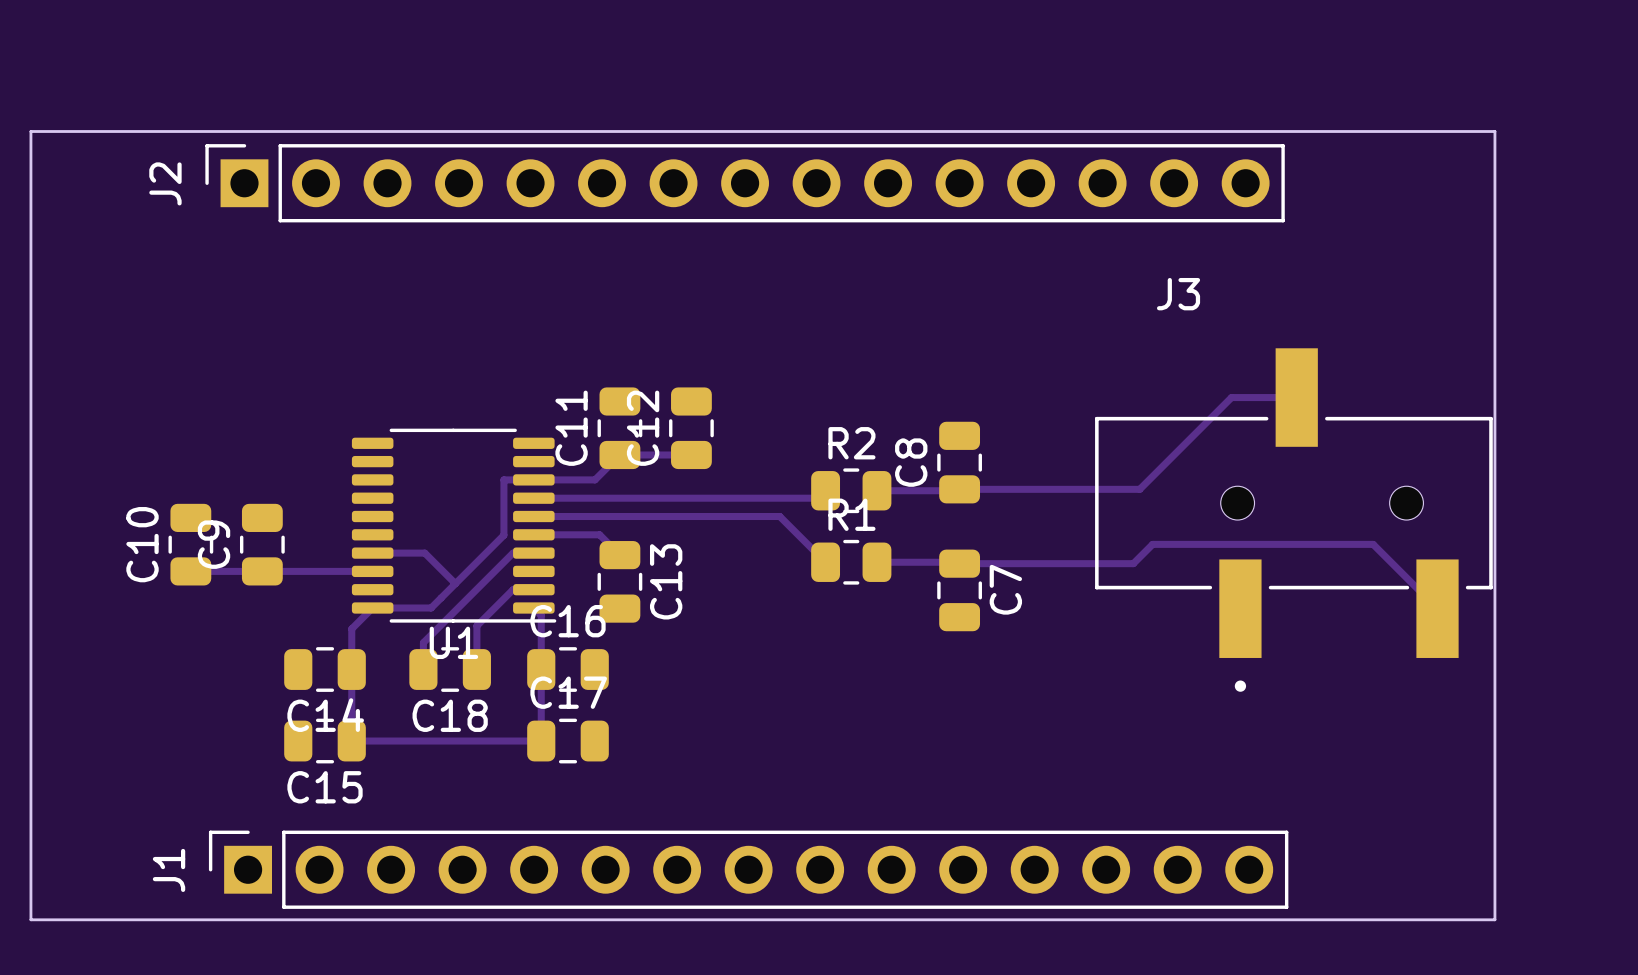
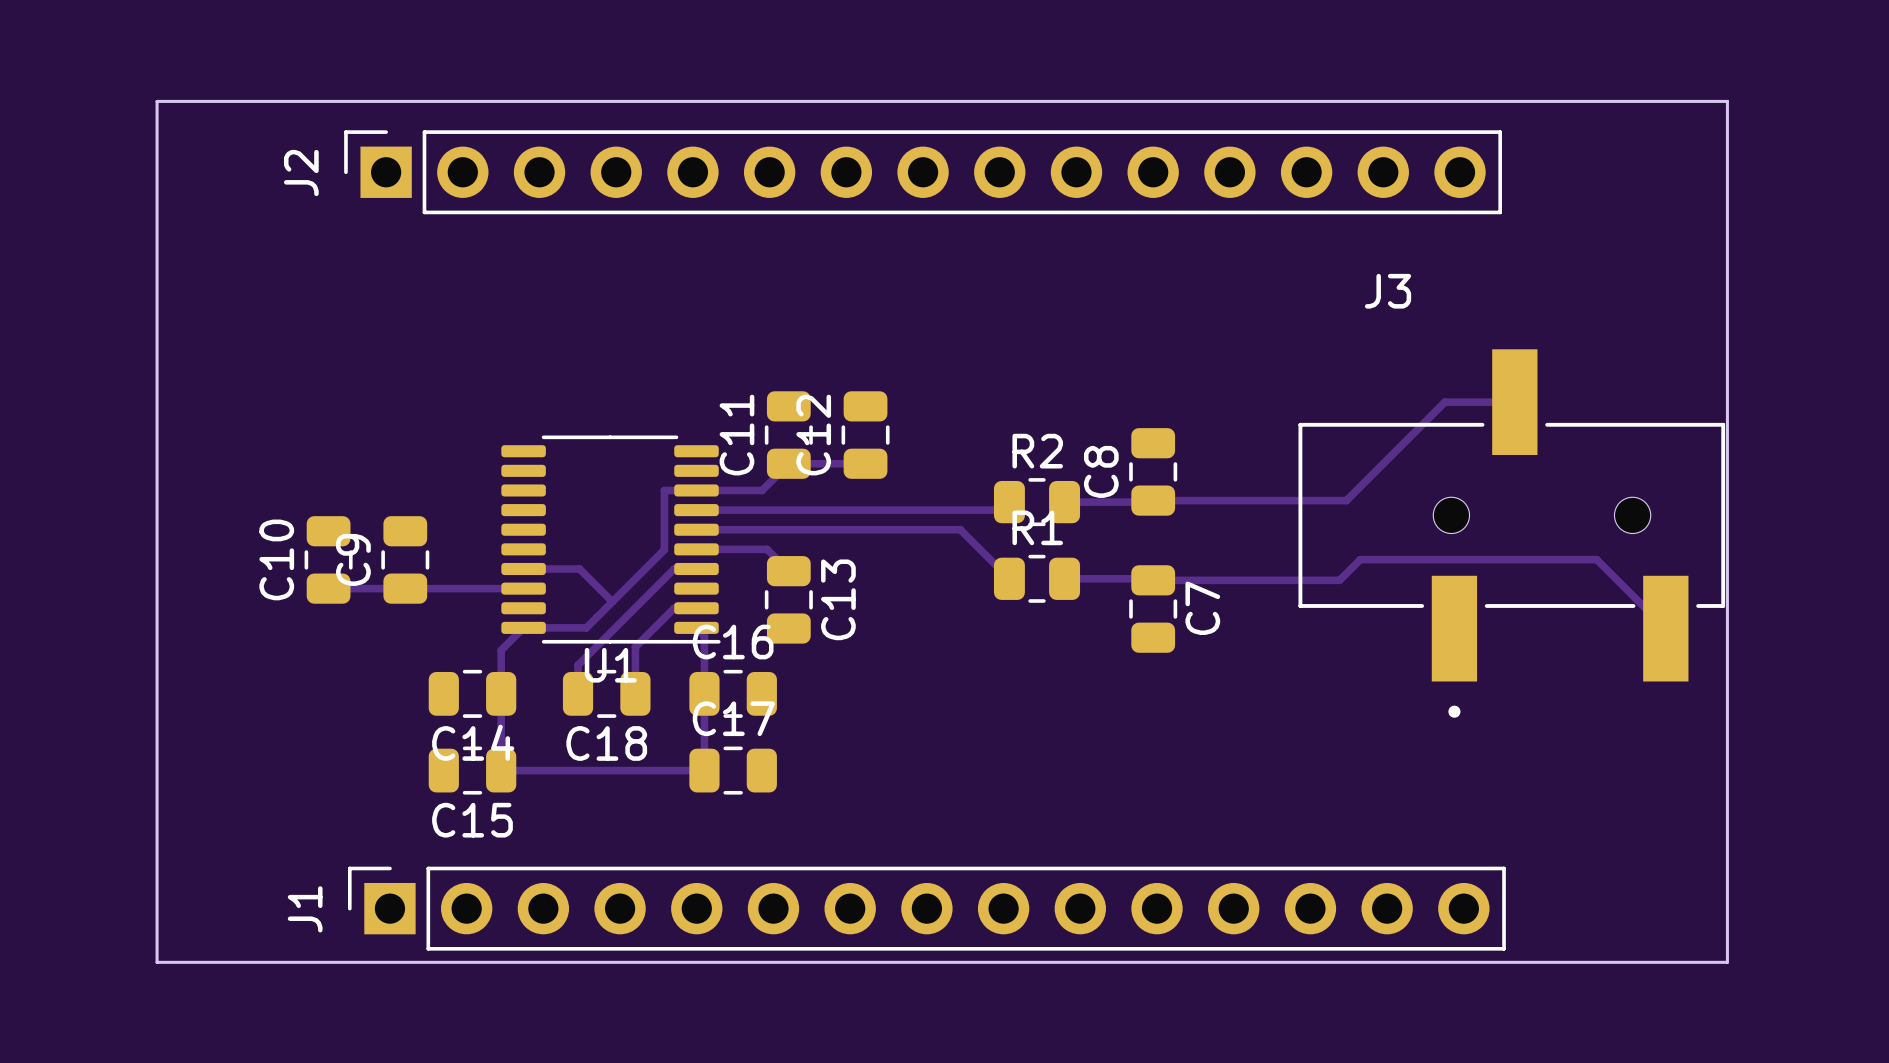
board edge: (30, 131) (1494, 131) -> (157, 116) (157, 101) (1727, 101) (1727, 116)

